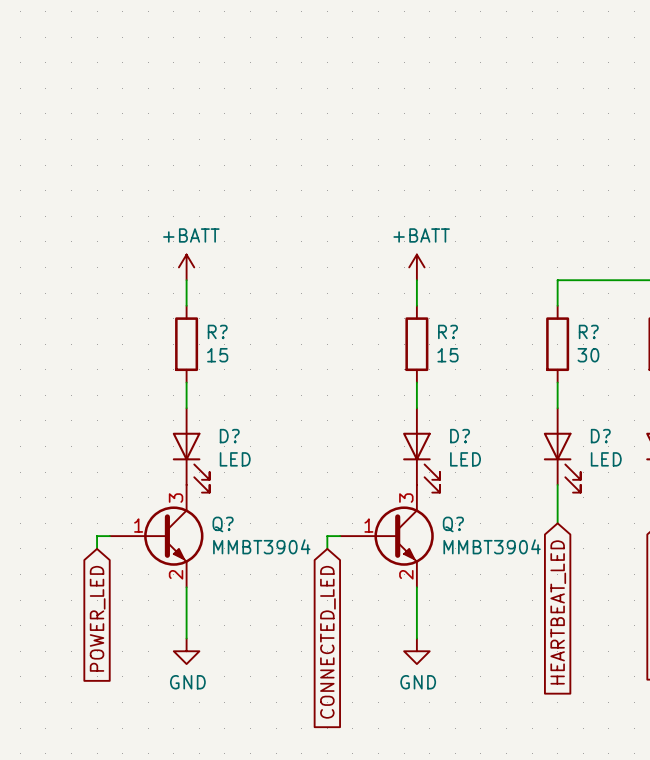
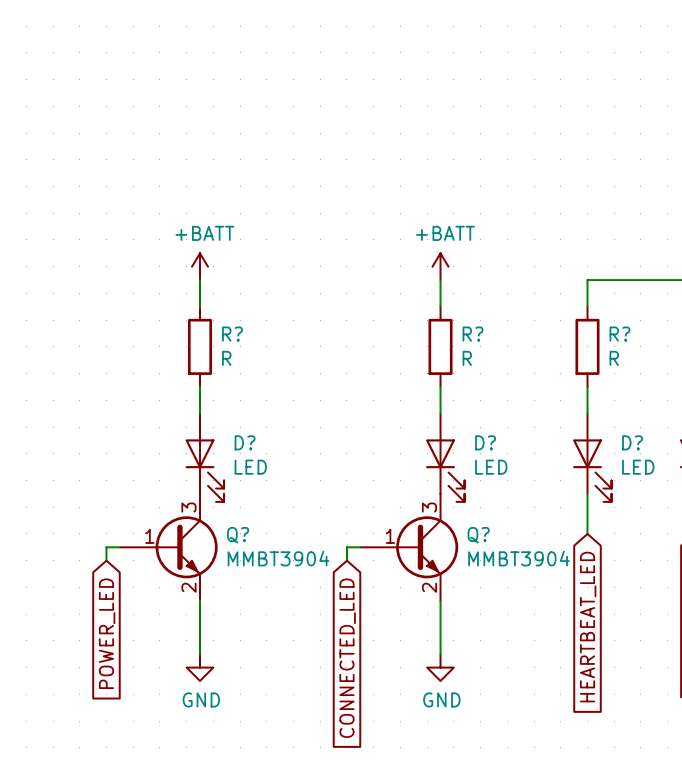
R? value: 15 (217, 355) -> R (226, 358)
R? value: 15 (448, 355) -> R (467, 358)
R? value: 30 (588, 355) -> R (614, 358)

